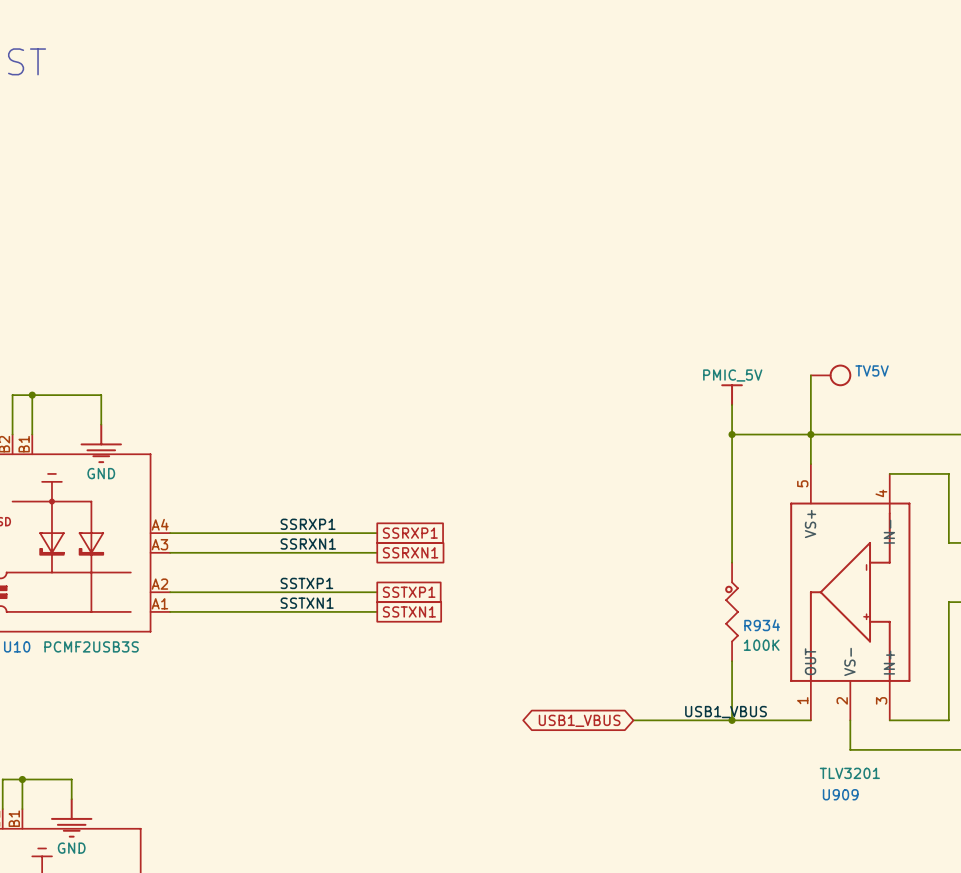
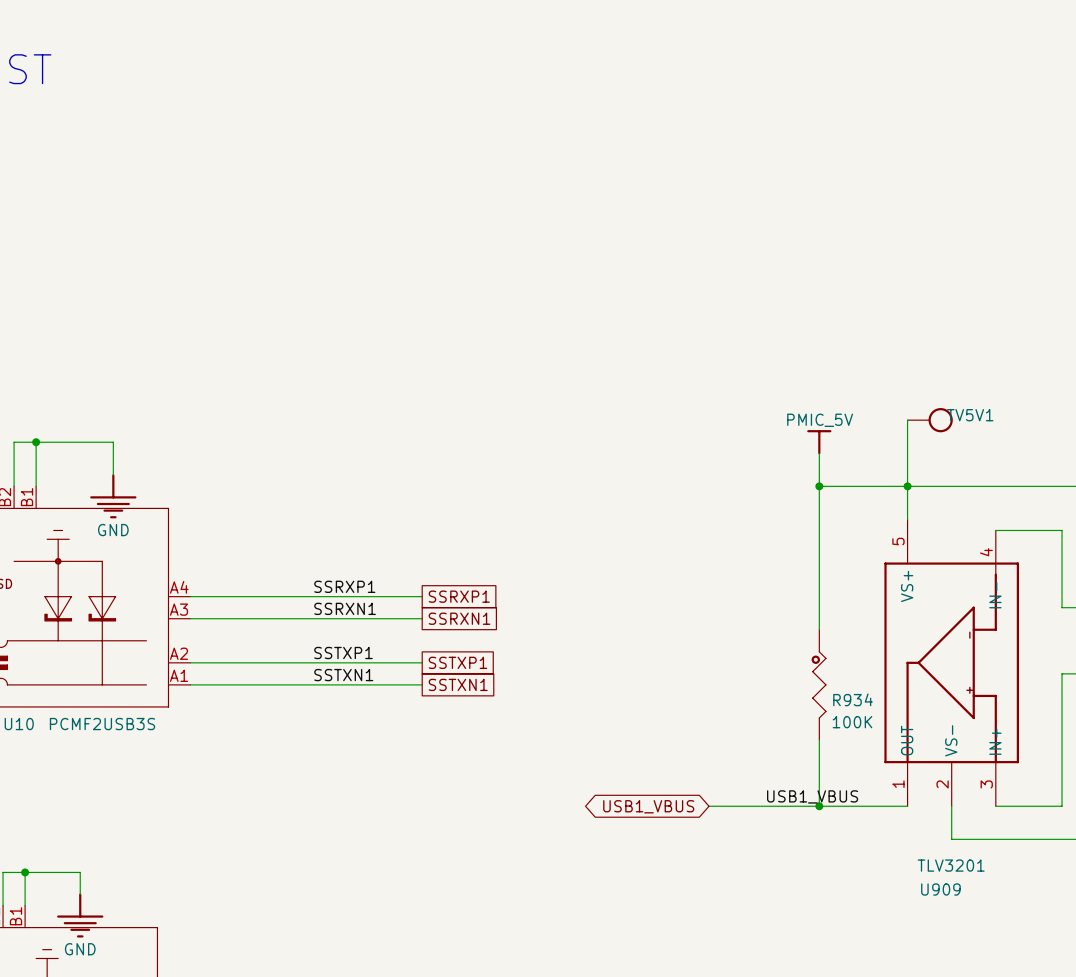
TV5V name: TV5V (872, 370) -> TV5V1 (970, 415)

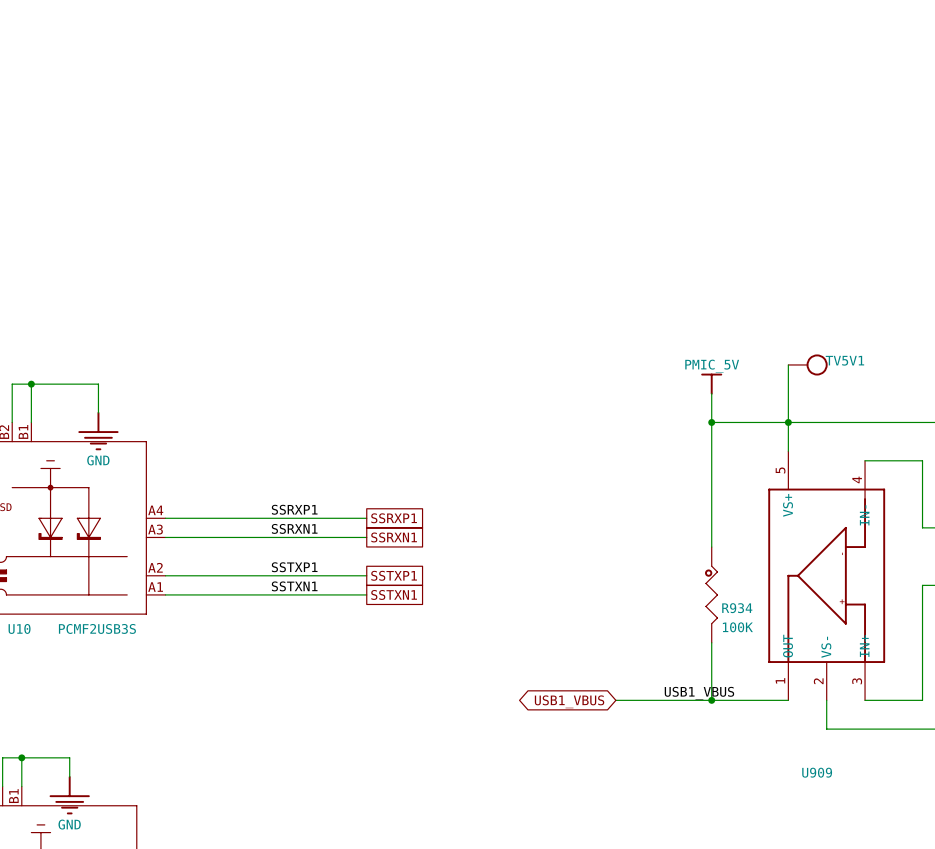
U909 value: TLV3201 (951, 865) -> none

